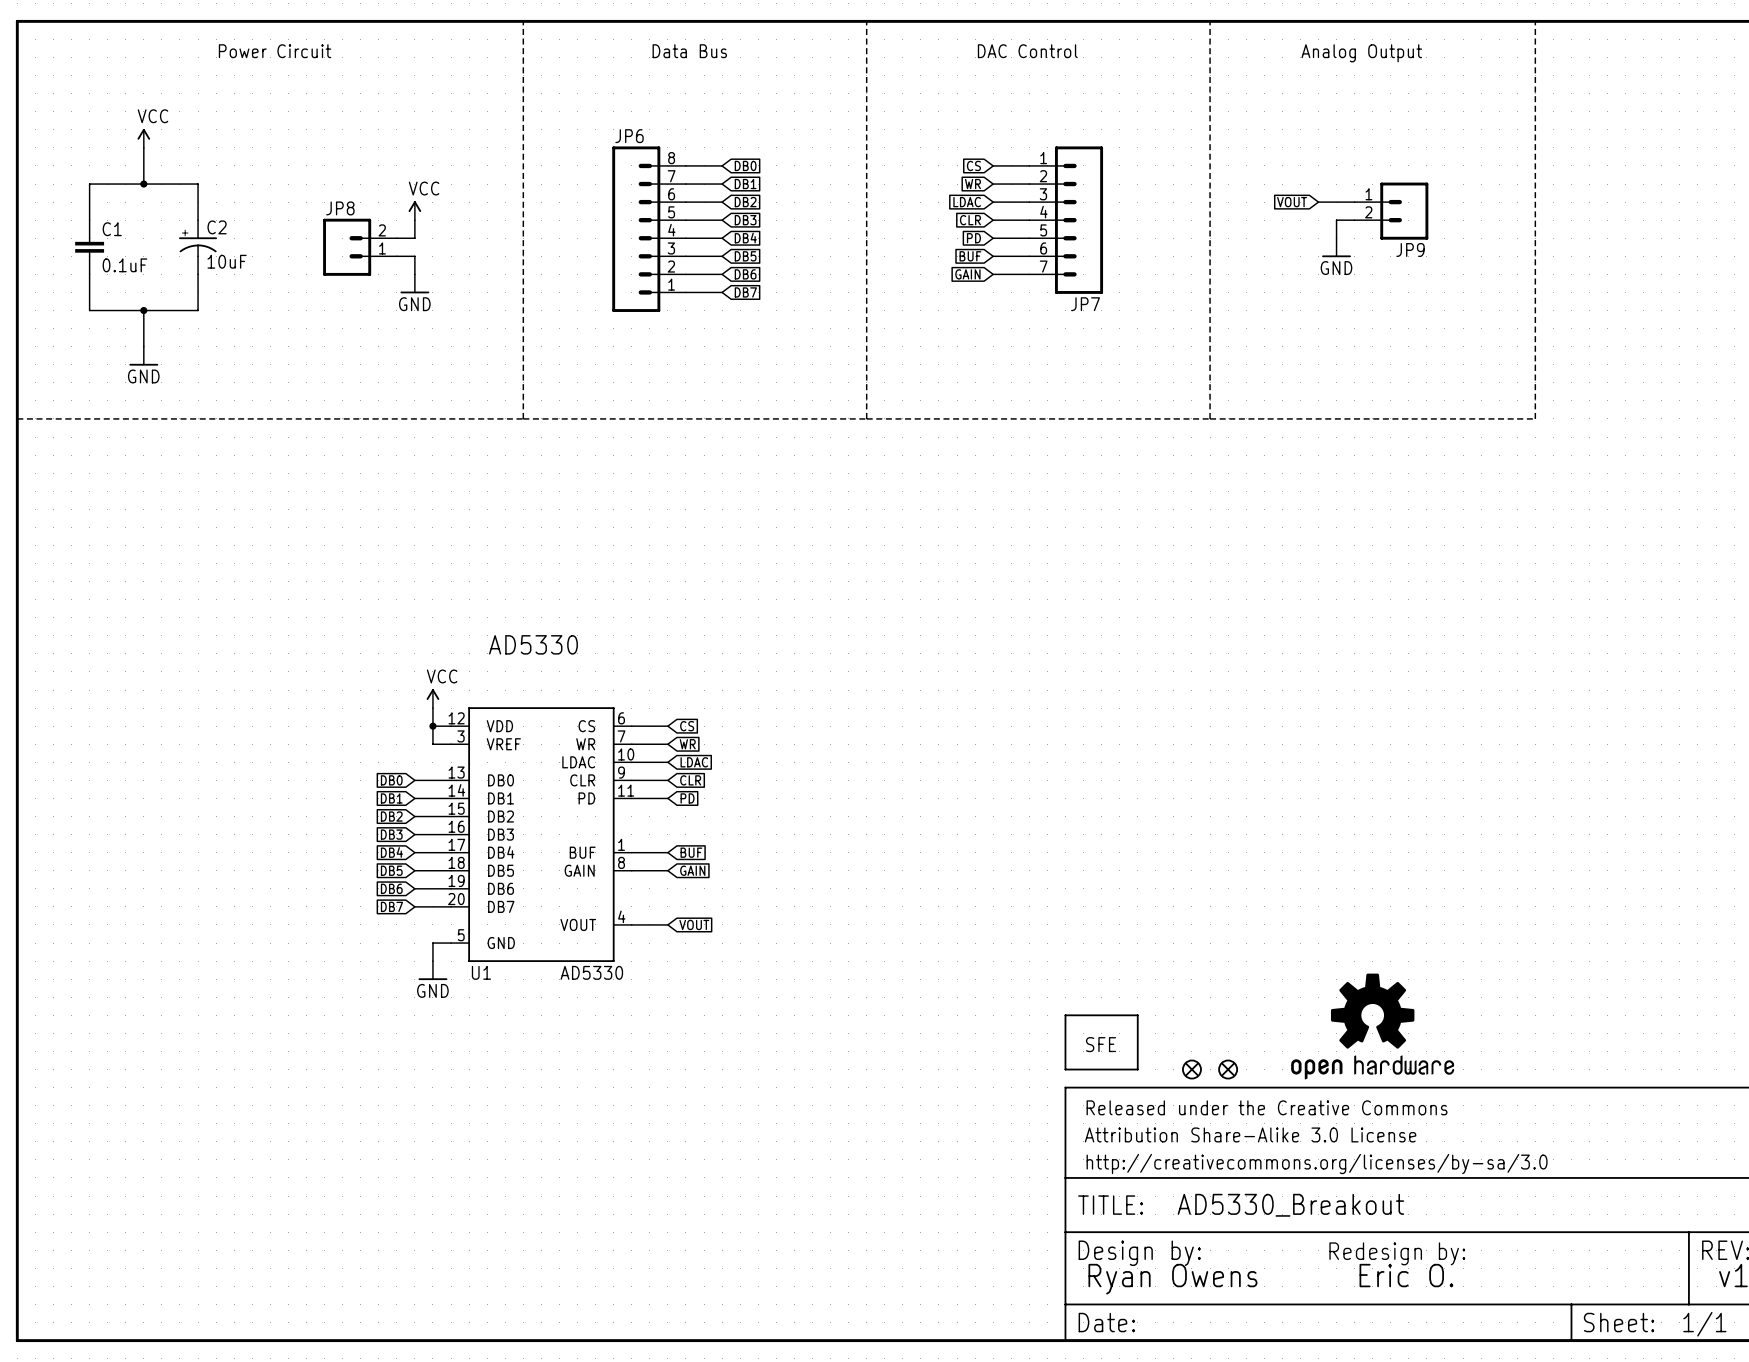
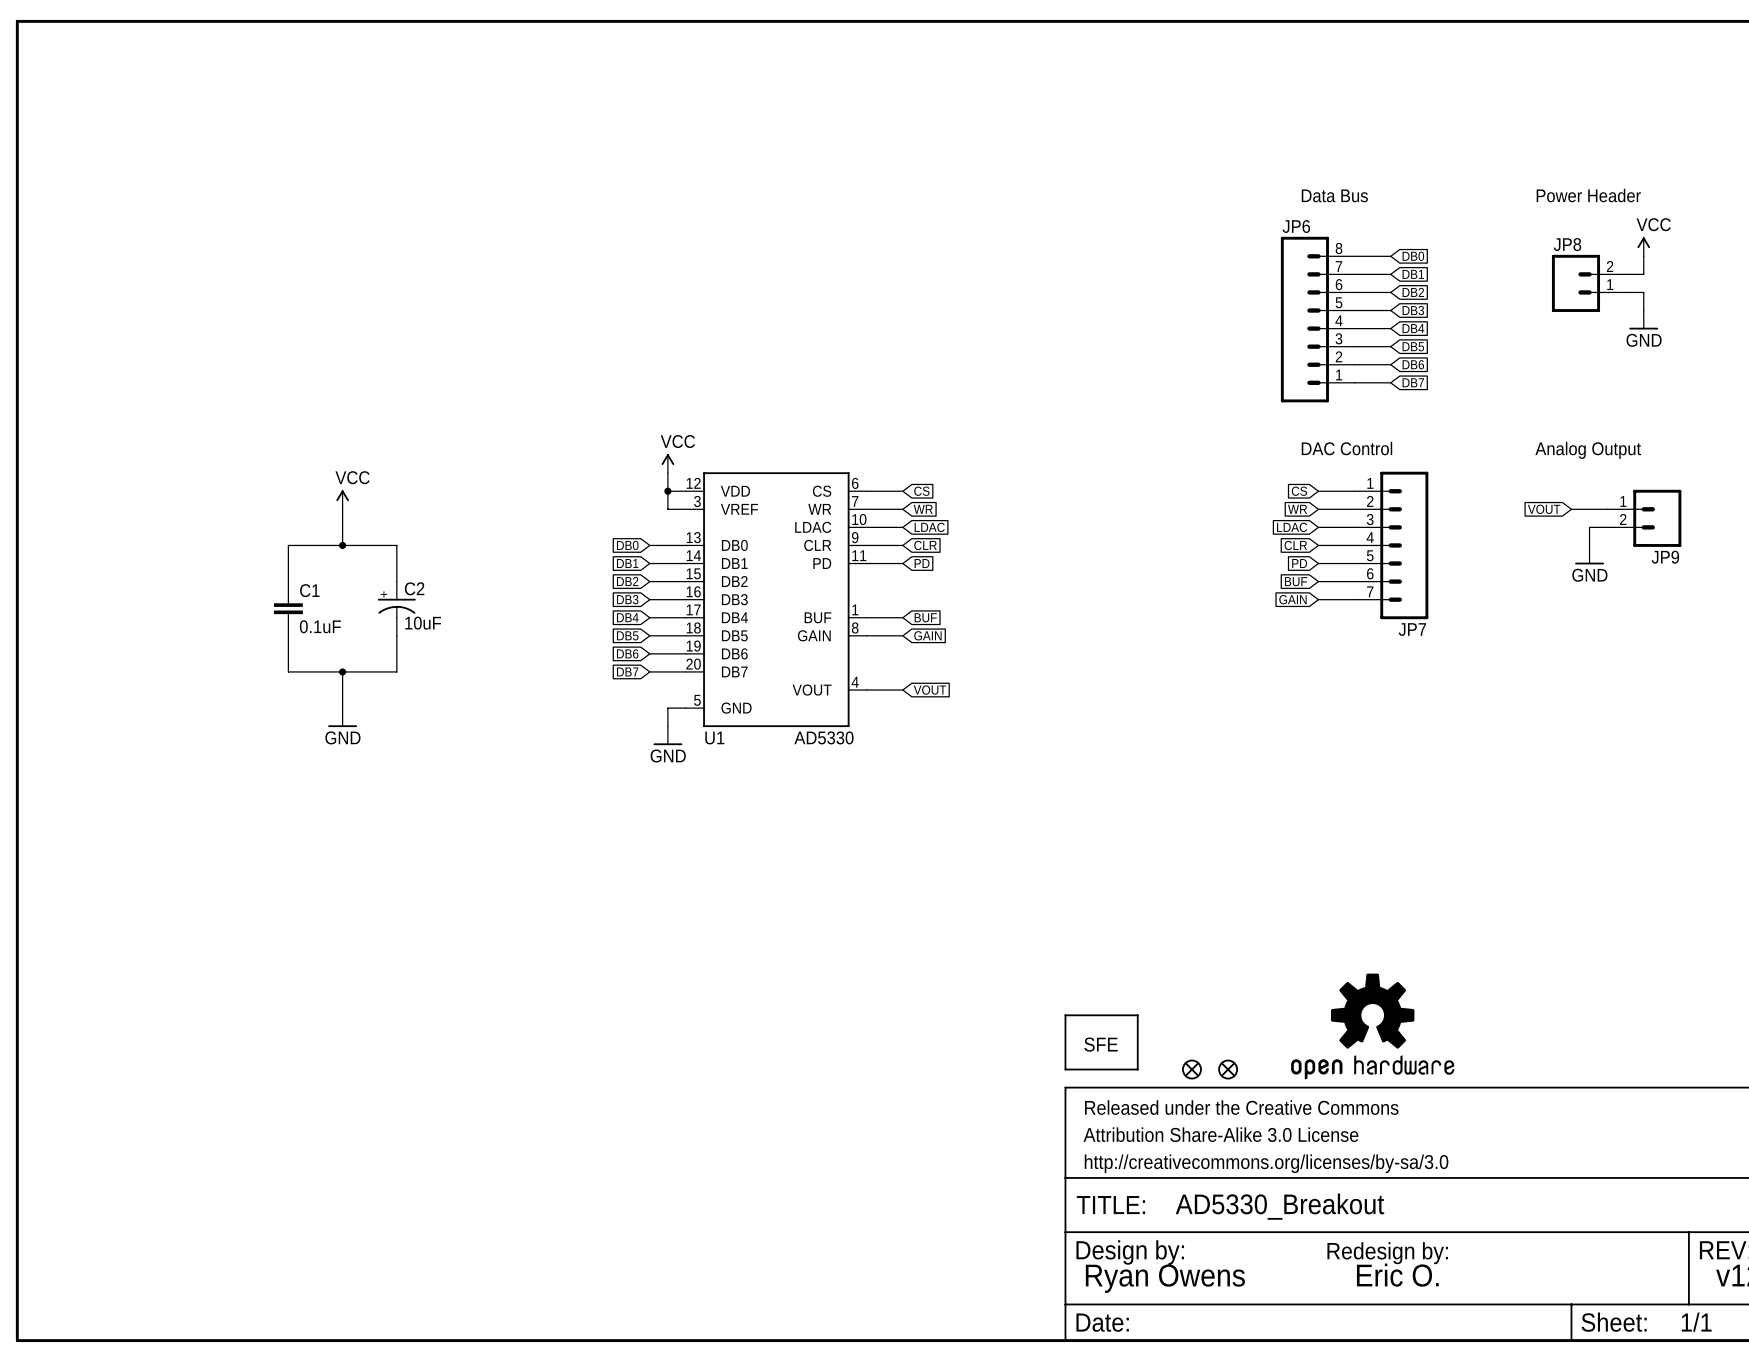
line: (523, 21) (523, 418) -> none
line: (866, 21) (866, 418) -> none
line: (1210, 21) (1210, 418) -> none
line: (1535, 21) (1535, 418) (17, 418) -> none
text: Power Circuit (275, 51) -> none
text: Data Bus (689, 51) -> none
text: DAC Control (1027, 51) -> none
text: Analog Output (1361, 53) -> none
power symbol: VCC (143, 138) -> none
wire: (143, 147) (143, 184) -> none
wire: (685, 165) (722, 165) -> none
global label: DB0 (745, 165) -> none
global label: CS (973, 165) -> none
wire: (993, 165) (1029, 165) -> none
junction: (143, 184) -> none
wire: (685, 184) (722, 184) -> none
global label: DB1 (745, 184) -> none
global label: WR (972, 184) -> none
wire: (993, 184) (1029, 184) -> none
text: none -> Data Bus (1334, 195)
text: none -> Power Header (1588, 195)
wire: (685, 202) (722, 202) -> none
global label: DB2 (745, 202) -> none
global label: LDAC (967, 202) -> none
wire: (993, 202) (1029, 202) -> none
global label: VOUT (1292, 202) -> none
wire: (1318, 202) (1354, 202) -> (1354, 256) (1390, 256)
power symbol: VCC (414, 210) -> none
JP9 position: (1391, 211) -> (1644, 518)
wire: (89, 220) (89, 184) (198, 184) (198, 220) -> none
wire: (414, 220) (414, 238) (396, 238) -> none
wire: (685, 220) (722, 220) -> none
global label: DB3 (745, 220) -> none
global label: CLR (970, 220) -> none
wire: (993, 220) (1029, 220) -> none
JP7 position: (1066, 220) -> (1391, 545)
wire: (1354, 220) (1336, 220) (1336, 238) -> none
JP6 position: (649, 229) -> (1317, 319)
wire: (685, 238) (722, 238) -> none
global label: DB4 (745, 238) -> none
global label: PD (973, 238) -> none
wire: (993, 238) (1029, 238) -> none
power symbol: none -> VCC (1643, 246)
C1 position: (89, 247) -> (288, 608)
C2 position: (198, 247) -> (396, 608)
JP8 position: (359, 247) -> (1588, 283)
power symbol: GND (1336, 247) -> none
wire: (396, 256) (414, 256) (414, 274) -> none
wire: (685, 256) (722, 256) -> none
global label: DB5 (745, 256) -> none
global label: BUF (970, 256) -> none
wire: (993, 256) (1029, 256) -> none
global label: none -> DB0 (1413, 256)
wire: none -> (1643, 256) (1643, 274) (1625, 274)
wire: (89, 274) (89, 310) (198, 310) (198, 274) -> none
wire: (685, 274) (722, 274) -> none
global label: DB6 (745, 274) -> none
global label: GAIN (967, 274) -> none
wire: (993, 274) (1029, 274) -> none
wire: none -> (1354, 274) (1390, 274)
global label: none -> DB1 (1413, 274)
power symbol: GND (414, 283) -> none
wire: (685, 292) (722, 292) -> none
global label: DB7 (745, 292) -> none
wire: none -> (1354, 292) (1390, 292)
global label: none -> DB2 (1413, 292)
wire: none -> (1625, 292) (1643, 292) (1643, 310)
wire: (143, 310) (143, 346) -> none
junction: (143, 310) -> none
wire: none -> (1354, 310) (1390, 310)
global label: none -> DB3 (1413, 310)
power symbol: none -> GND (1643, 320)
wire: none -> (1354, 328) (1390, 328)
global label: none -> DB4 (1413, 328)
wire: none -> (1354, 346) (1390, 346)
global label: none -> DB5 (1413, 346)
power symbol: GND (143, 356) -> none
wire: none -> (1354, 364) (1390, 364)
global label: none -> DB6 (1413, 364)
wire: none -> (1354, 382) (1390, 382)
global label: none -> DB7 (1413, 382)
text: none -> DAC Control (1346, 448)
text: none -> Analog Output (1588, 450)
power symbol: none -> VCC (667, 463)
wire: none -> (667, 473) (667, 509) (685, 509)
wire: none -> (667, 491) (685, 491)
junction: none -> (667, 491)
wire: none -> (866, 491) (902, 491)
global label: none -> CS (921, 491)
global label: none -> CS (1299, 491)
wire: none -> (1318, 491) (1354, 491)
power symbol: none -> VCC (342, 499)
wire: none -> (342, 509) (342, 545)
wire: none -> (866, 509) (902, 509)
global label: none -> WR (923, 509)
global label: none -> WR (1297, 509)
wire: none -> (1318, 509) (1354, 509)
global label: none -> VOUT (1544, 509)
wire: none -> (1571, 509) (1607, 509)
wire: none -> (866, 527) (902, 527)
global label: none -> LDAC (929, 527)
global label: none -> LDAC (1292, 527)
wire: none -> (1318, 527) (1354, 527)
wire: none -> (1607, 527) (1589, 527) (1589, 545)
junction: none -> (342, 545)
global label: none -> DB0 (627, 545)
wire: none -> (649, 545) (685, 545)
wire: none -> (866, 545) (902, 545)
global label: none -> CLR (925, 545)
global label: none -> CLR (1295, 545)
wire: none -> (1318, 545) (1354, 545)
power symbol: none -> GND (1589, 554)
global label: none -> DB1 (627, 563)
wire: none -> (649, 563) (685, 563)
wire: none -> (866, 563) (902, 563)
global label: none -> PD (922, 563)
global label: none -> PD (1299, 563)
wire: none -> (1318, 563) (1354, 563)
wire: none -> (288, 581) (288, 545) (396, 545) (396, 581)
global label: none -> DB2 (627, 581)
wire: none -> (649, 581) (685, 581)
global label: none -> BUF (1296, 581)
wire: none -> (1318, 581) (1354, 581)
global label: none -> DB3 (627, 599)
wire: none -> (649, 599) (685, 599)
global label: none -> GAIN (1292, 599)
wire: none -> (1318, 599) (1354, 599)
global label: none -> DB4 (627, 617)
wire: none -> (866, 617) (902, 617)
global label: none -> BUF (925, 617)
wire: none -> (288, 635) (288, 671) (396, 671) (396, 635)
global label: none -> DB5 (627, 635)
wire: none -> (866, 635) (902, 635)
global label: none -> GAIN (927, 635)
text: AD5330 (533, 644) -> none
global label: none -> DB6 (627, 653)
wire: none -> (342, 671) (342, 708)
junction: none -> (342, 671)
global label: none -> DB7 (627, 671)
wire: none -> (866, 690) (902, 690)
global label: none -> VOUT (929, 690)
power symbol: VCC (432, 698) -> none
wire: (432, 708) (432, 744) (451, 744) -> none
power symbol: none -> GND (342, 717)
wire: (432, 726) (451, 726) -> none
junction: (432, 726) -> none
wire: (631, 726) (667, 726) -> (685, 708) (667, 708) (667, 726)
global label: CS (687, 726) -> none
power symbol: none -> GND (667, 735)
wire: (631, 744) (667, 744) -> (649, 617) (685, 617)
global label: WR (687, 744) -> none
wire: (631, 762) (667, 762) -> (649, 635) (685, 635)
global label: LDAC (694, 762) -> none
global label: DB0 (391, 780) -> none
wire: (414, 780) (451, 780) -> none
wire: (631, 780) (667, 780) -> (649, 653) (685, 653)
global label: CLR (690, 780) -> none
global label: DB1 (391, 798) -> none
wire: (414, 798) (451, 798) -> none
wire: (631, 798) (667, 798) -> (649, 671) (685, 671)
global label: PD (687, 798) -> none
global label: DB2 (391, 816) -> none
wire: (414, 816) (451, 816) -> none
global label: DB3 (391, 834) -> none
wire: (414, 834) (451, 834) -> none
U1 position: (541, 834) -> (776, 599)
global label: DB4 (391, 852) -> none
wire: (414, 852) (451, 852) -> none
wire: (631, 852) (667, 852) -> none
global label: BUF (691, 852) -> none
global label: DB5 (391, 870) -> none
wire: (414, 870) (451, 870) -> none
wire: (631, 870) (667, 870) -> none
global label: GAIN (692, 870) -> none
global label: DB6 (391, 888) -> none
wire: (414, 888) (451, 888) -> none
global label: DB7 (391, 906) -> none
wire: (414, 906) (451, 906) -> none
wire: (631, 924) (667, 924) -> none
global label: VOUT (694, 924) -> none
wire: (451, 943) (432, 943) (432, 961) -> none
power symbol: GND (432, 970) -> none

